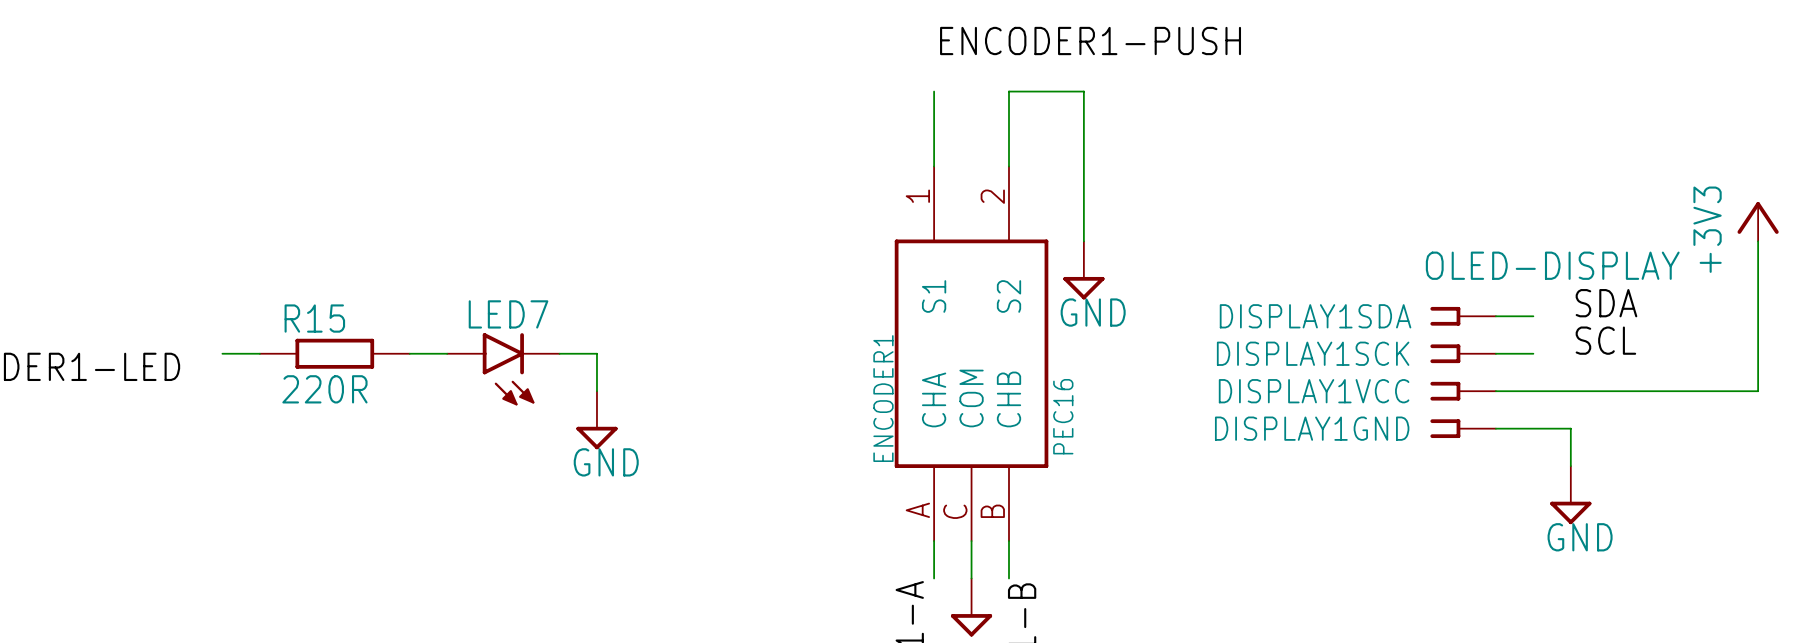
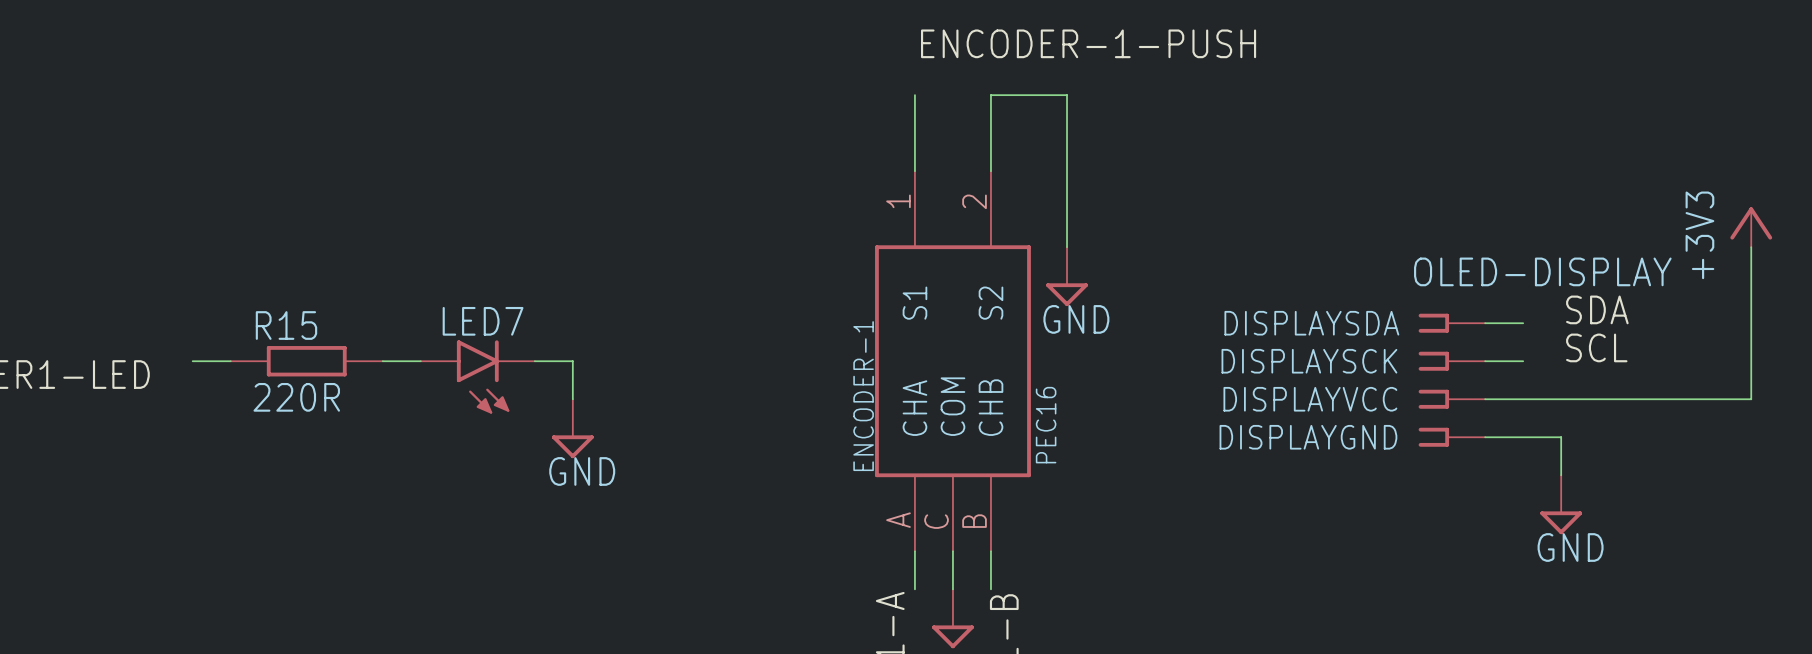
label: ENCODER1-PUSH (1090, 40) -> ENCODER-1-PUSH (1088, 43)
DISPLAY1SDA name: DISPLAY1SDA (1315, 316) -> DISPLAYSDA (1311, 323)
DISPLAY1SCK name: DISPLAY1SCK (1313, 353) -> DISPLAYSCK (1309, 361)
DISPLAY1VCC name: DISPLAY1VCC (1314, 391) -> DISPLAYVCC (1310, 399)
ENCODER1 name: ENCODER1 (883, 398) -> ENCODER-1 (863, 396)
DISPLAY1GND name: DISPLAY1GND (1312, 428) -> DISPLAYGND (1308, 437)

